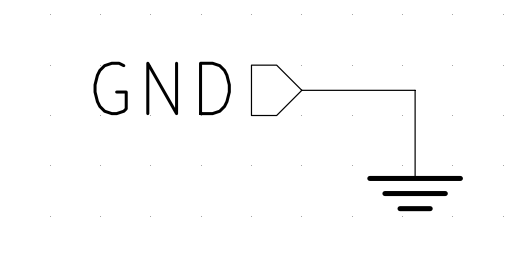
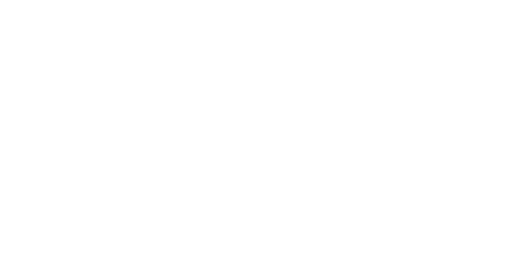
hierarchical label: GND (162, 88) -> none
wire: (301, 90) (415, 90) (415, 178) -> none
power symbol: (415, 193) -> none

